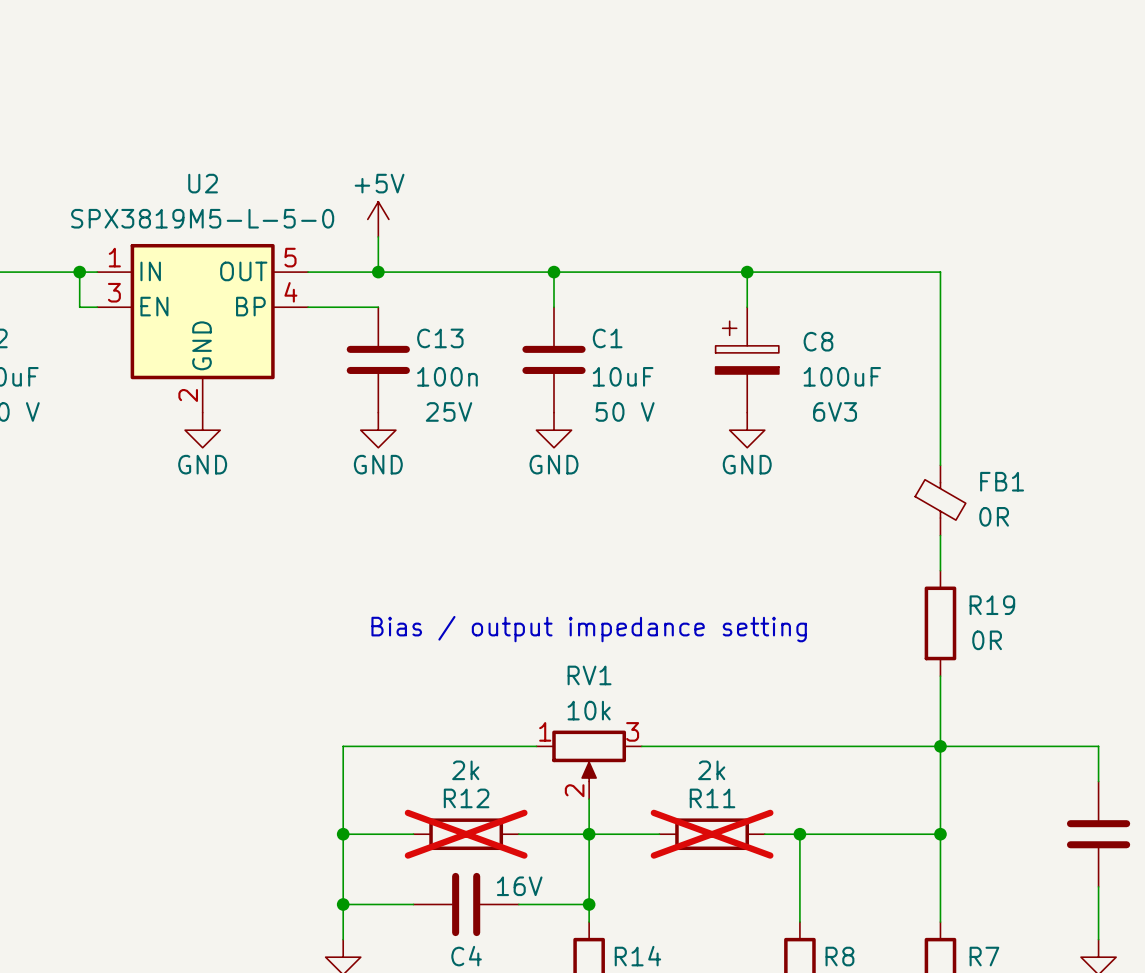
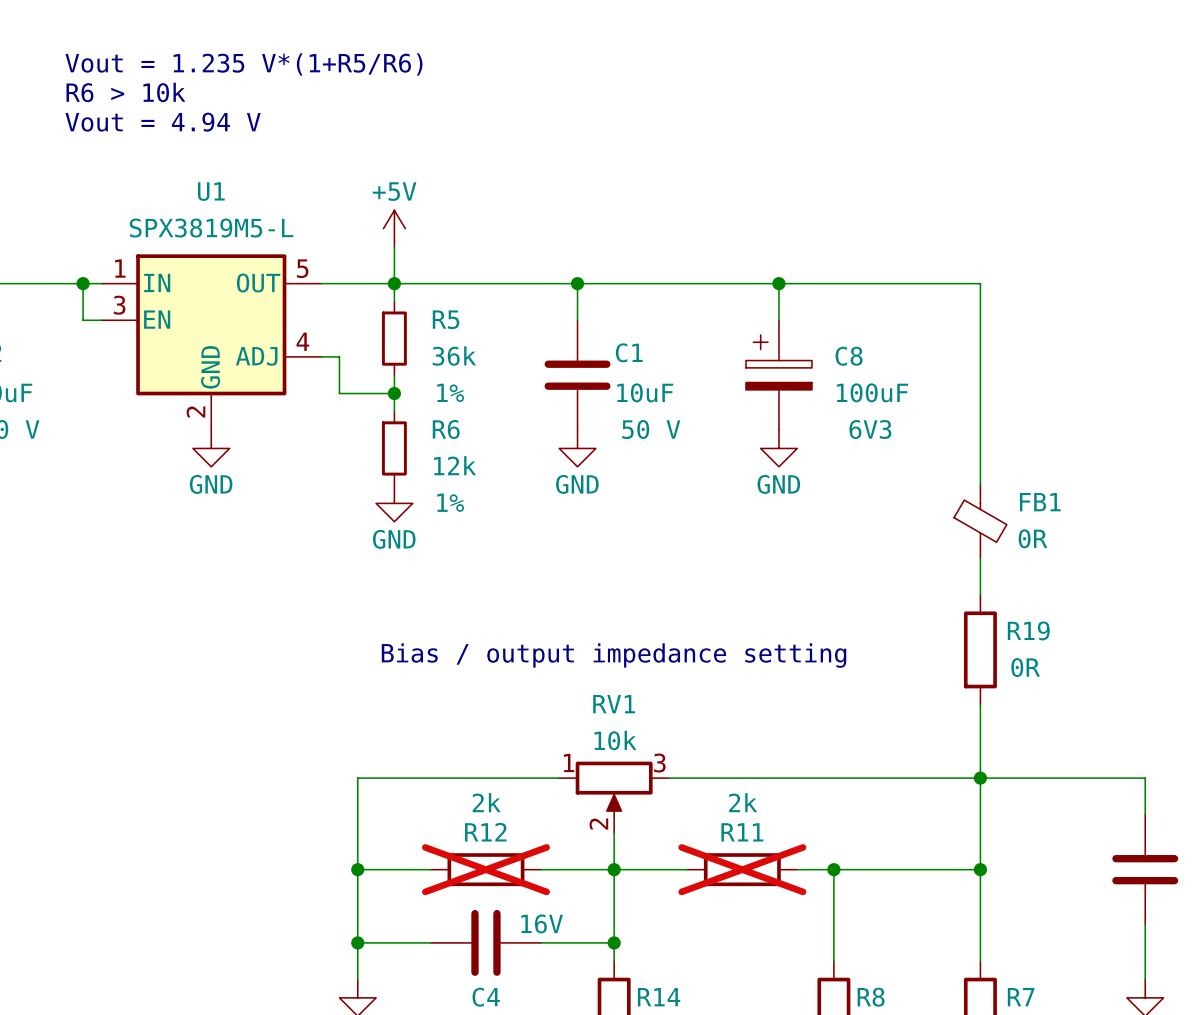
text: none -> Vout = 1.235 V*(1+R5/R6) (243, 64)
text: none -> R6 > 10k (125, 92)
text: none -> Vout = 4.94 V (163, 122)
wire: none -> (394, 283) (394, 301)
wire: (308, 307) (378, 307) -> none
R5: none -> 36k (394, 338)
U2: SPX3819M5-L-5-0 (202, 328) -> none
U1: none -> SPX3819M5-L (211, 342)
wire: none -> (321, 356) (339, 356) (339, 393) (394, 393)
C13: 100n (378, 359) -> none
junction: none -> (394, 393)
power symbol position: GND (378, 430) -> GND (394, 503)
R6: none -> 12k (394, 448)

